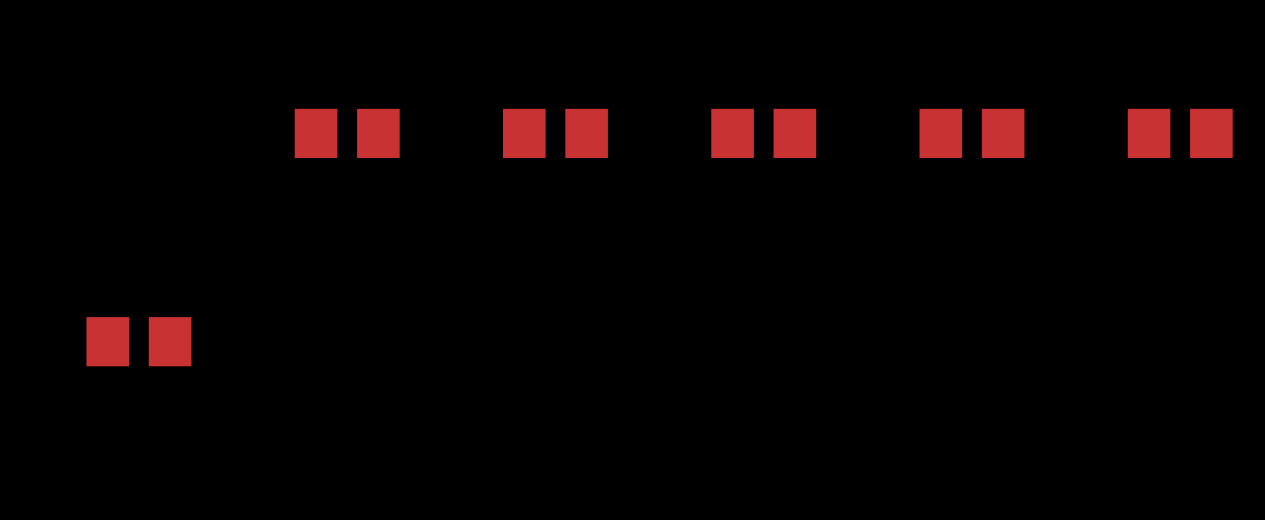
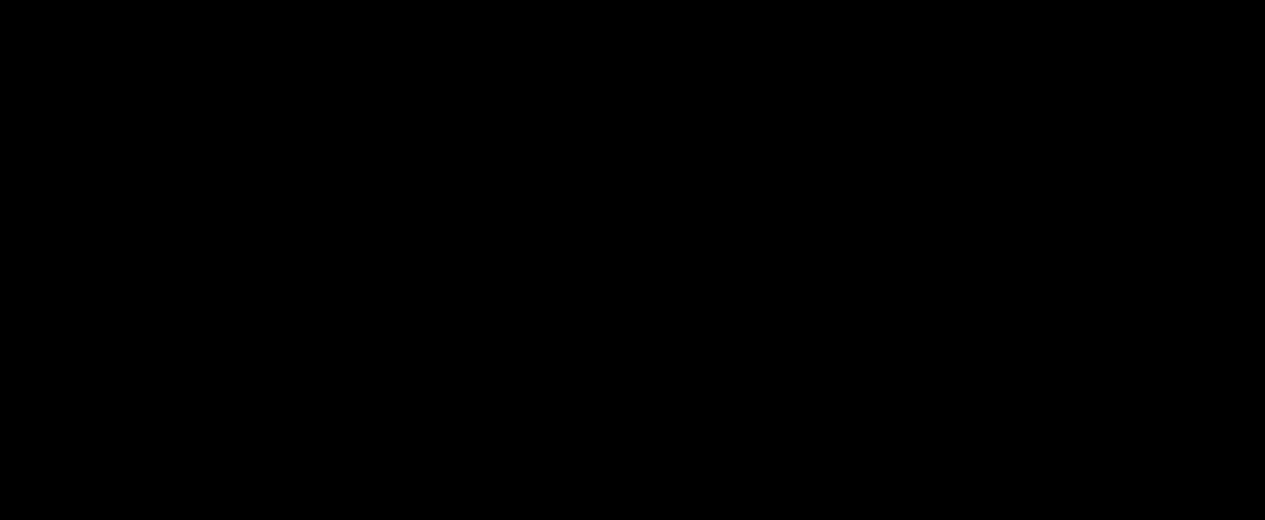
part: (347, 133) -> none
part: (555, 133) -> none
part: (763, 133) -> none
part: (971, 133) -> none
part: (1180, 133) -> none
part: (138, 341) -> none

